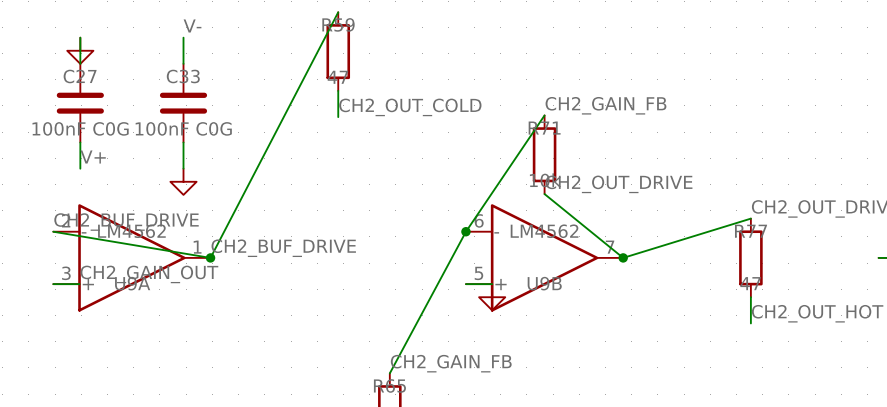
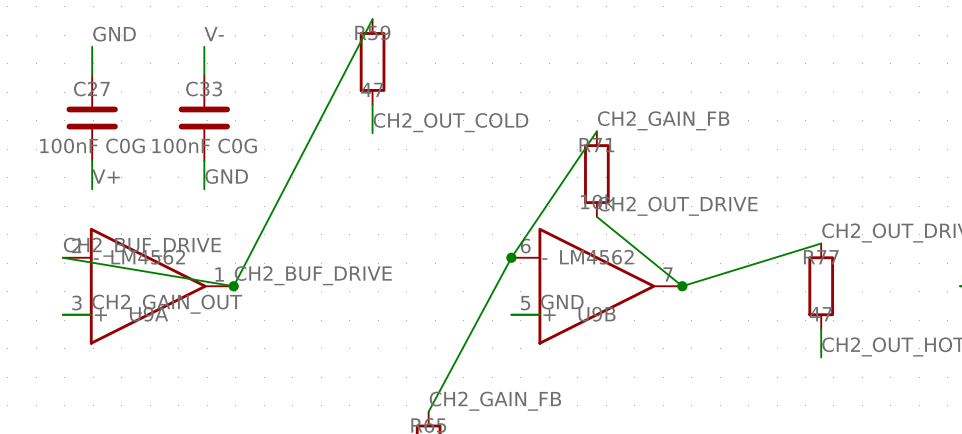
label: none -> GND (114, 34)
power symbol: (80, 50) -> none
label: none -> GND (226, 176)
power symbol: (183, 181) -> none
label: none -> GND (562, 302)
power symbol: (492, 297) -> none

